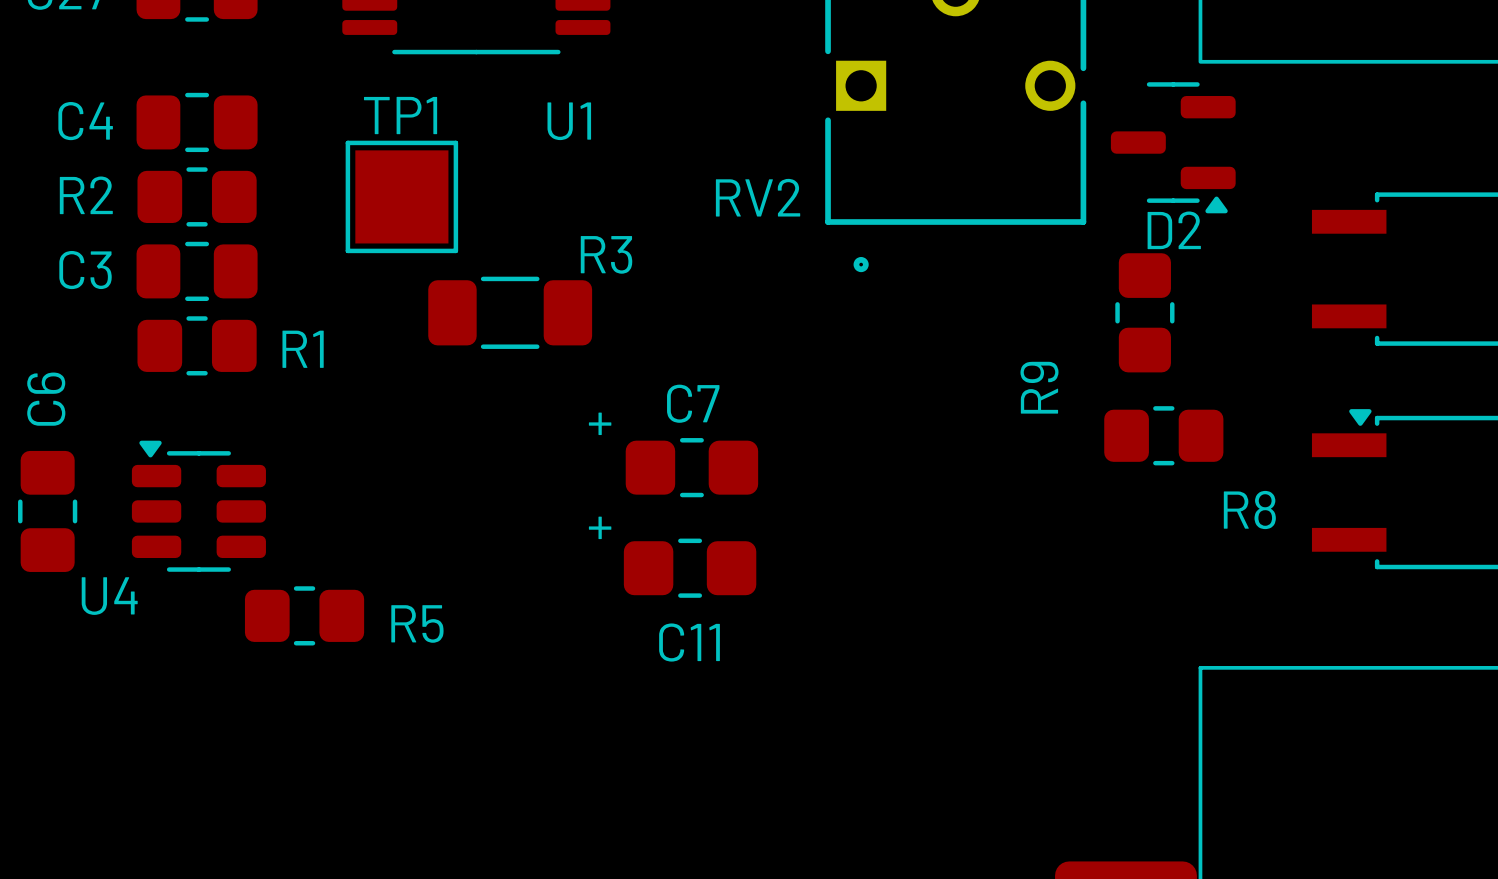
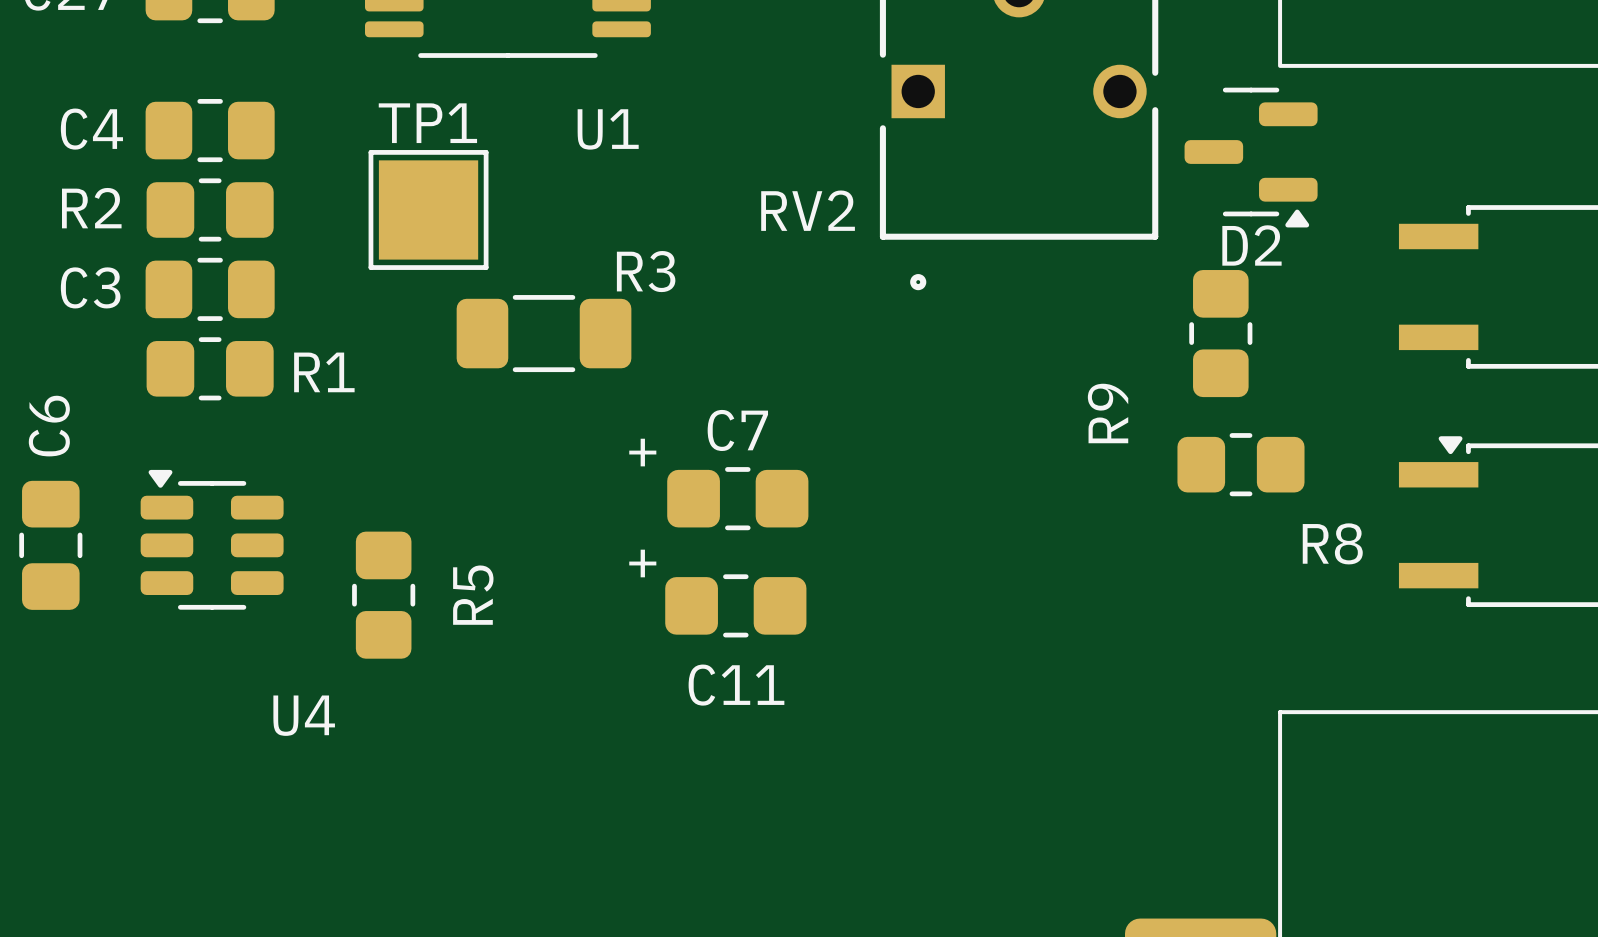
U4 name position: U4 (109, 596) -> U4 (304, 715)
R5 rotation: 0° (304, 615) -> 90° clockwise (383, 595)
R5 position: (304, 615) -> (383, 595)

